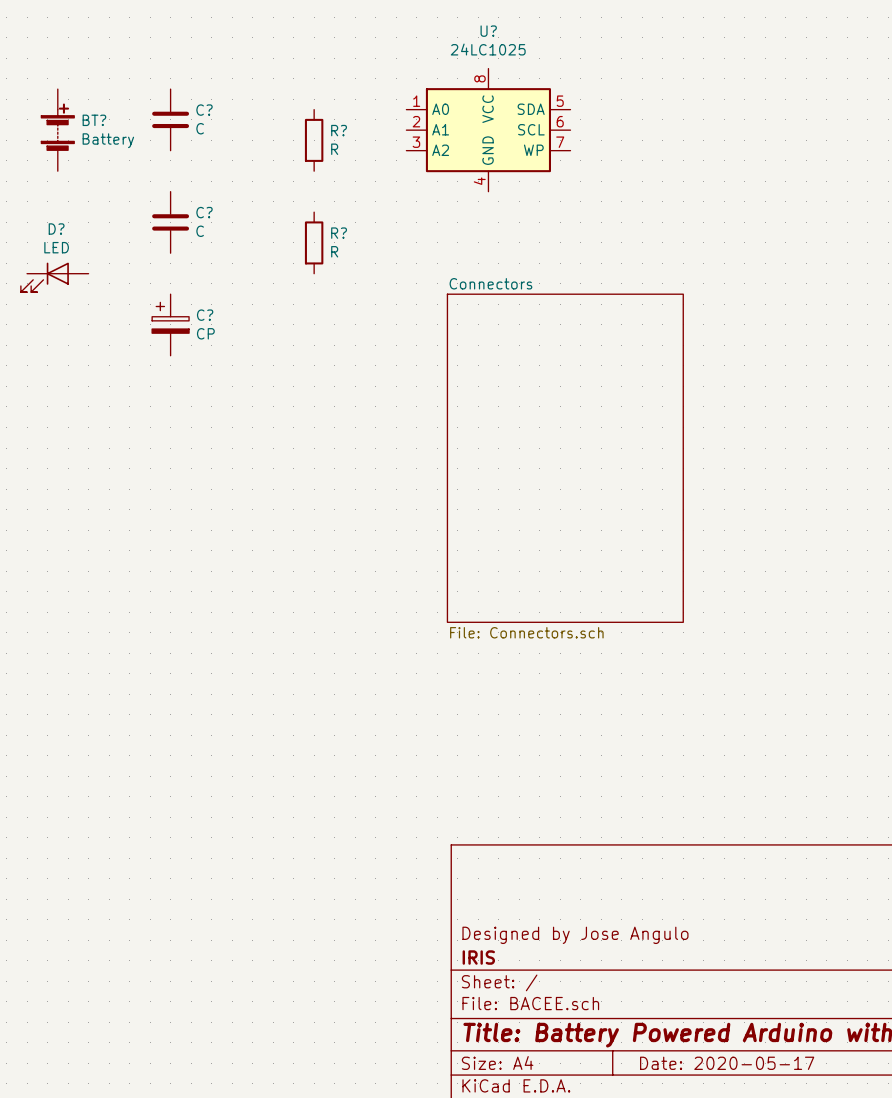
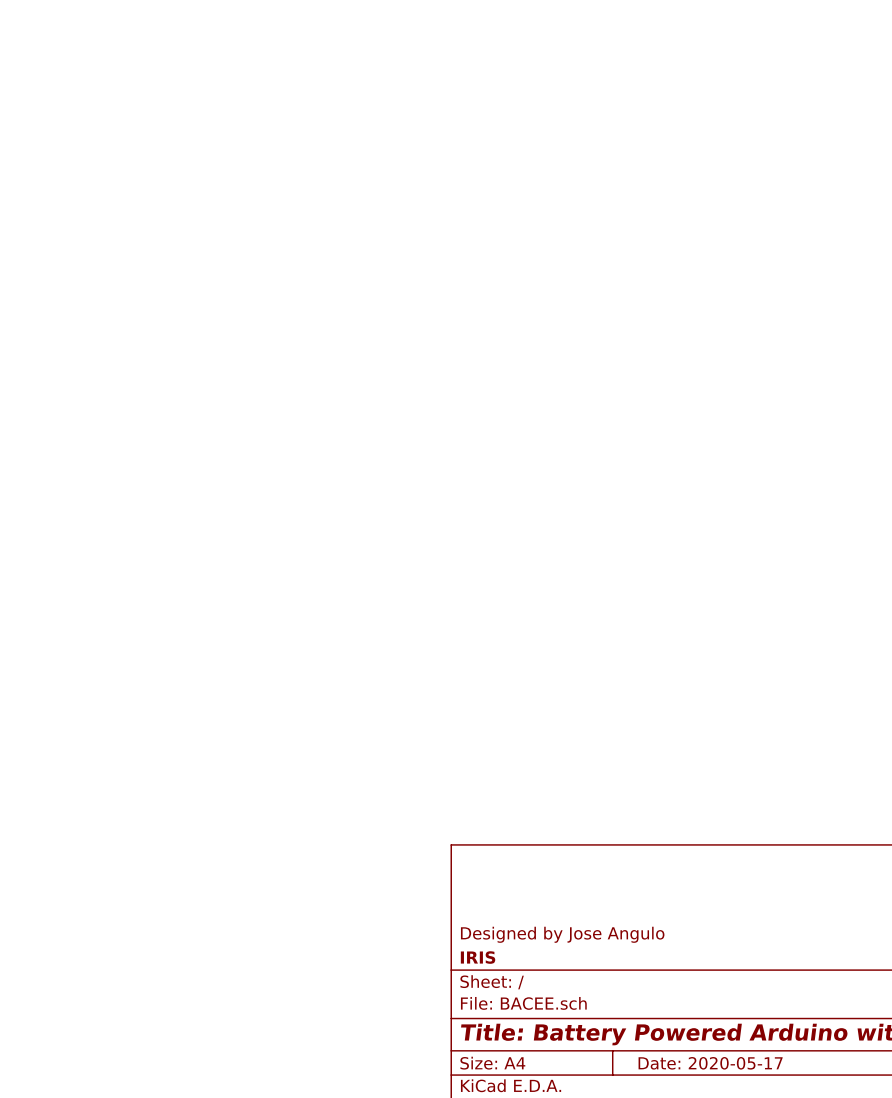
C?: C (170, 119) -> none
BT?: Battery (57, 130) -> none
U?: 24LC1025 (488, 130) -> none
R?: R (314, 140) -> none
C?: C (170, 222) -> none
R?: R (314, 242) -> none
D?: LED (54, 277) -> none
C?: CP (170, 324) -> none
sheet Connectors: File: Connectors.sch (565, 458) -> none

